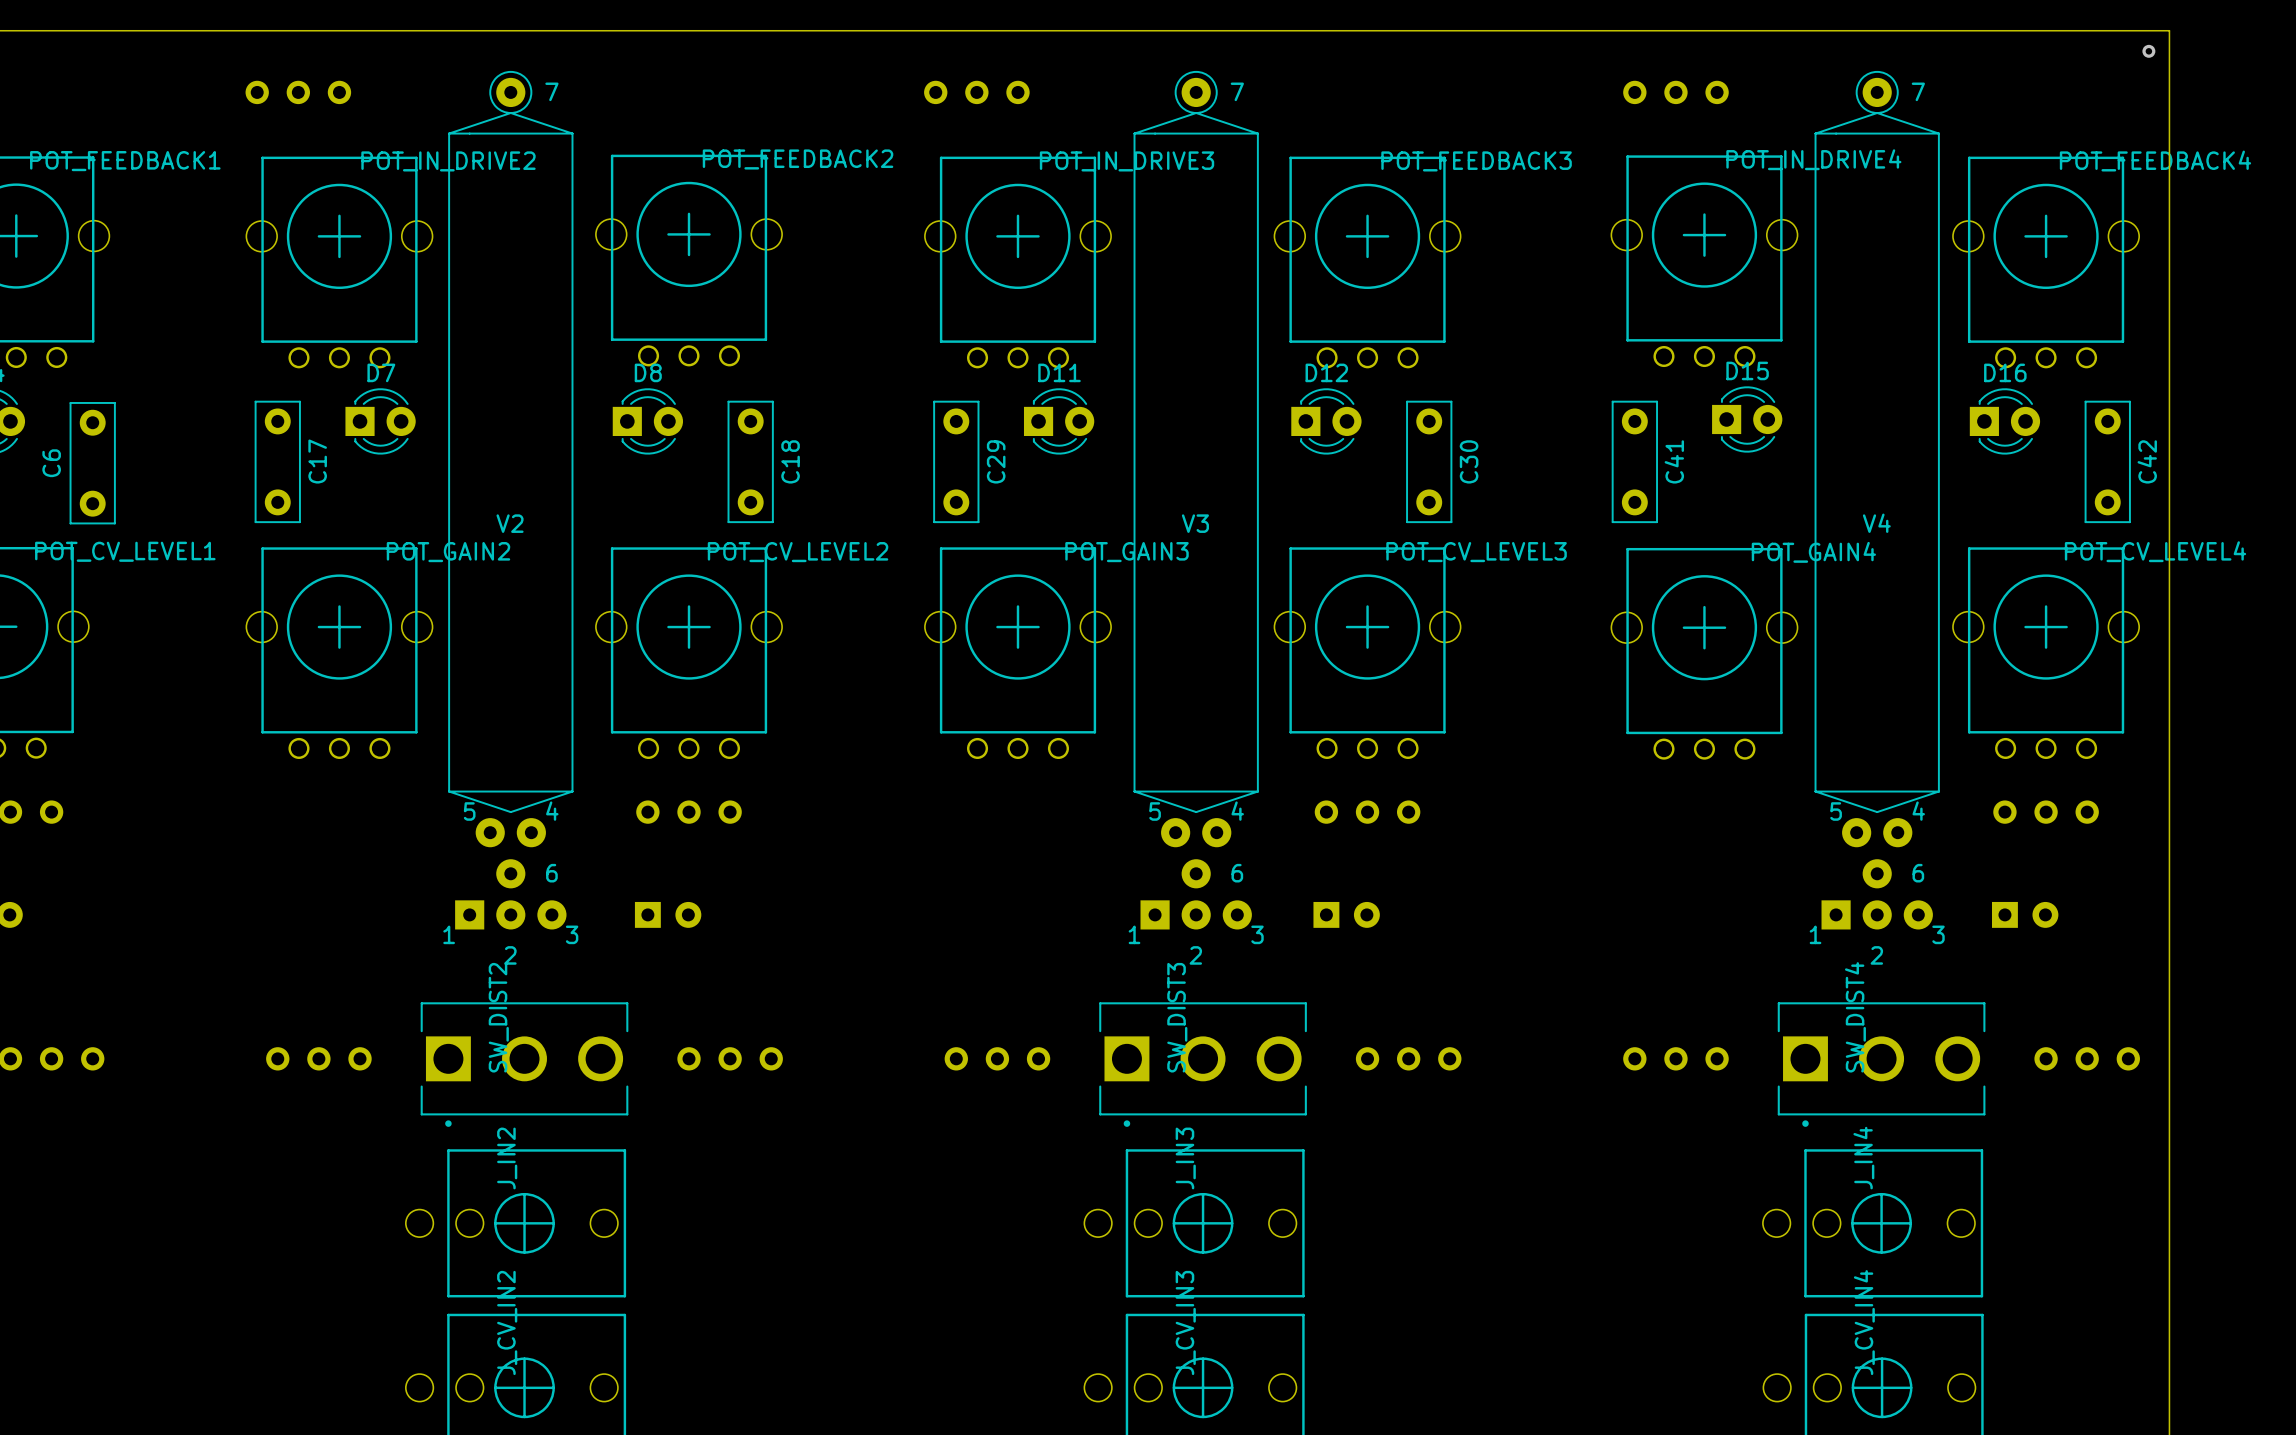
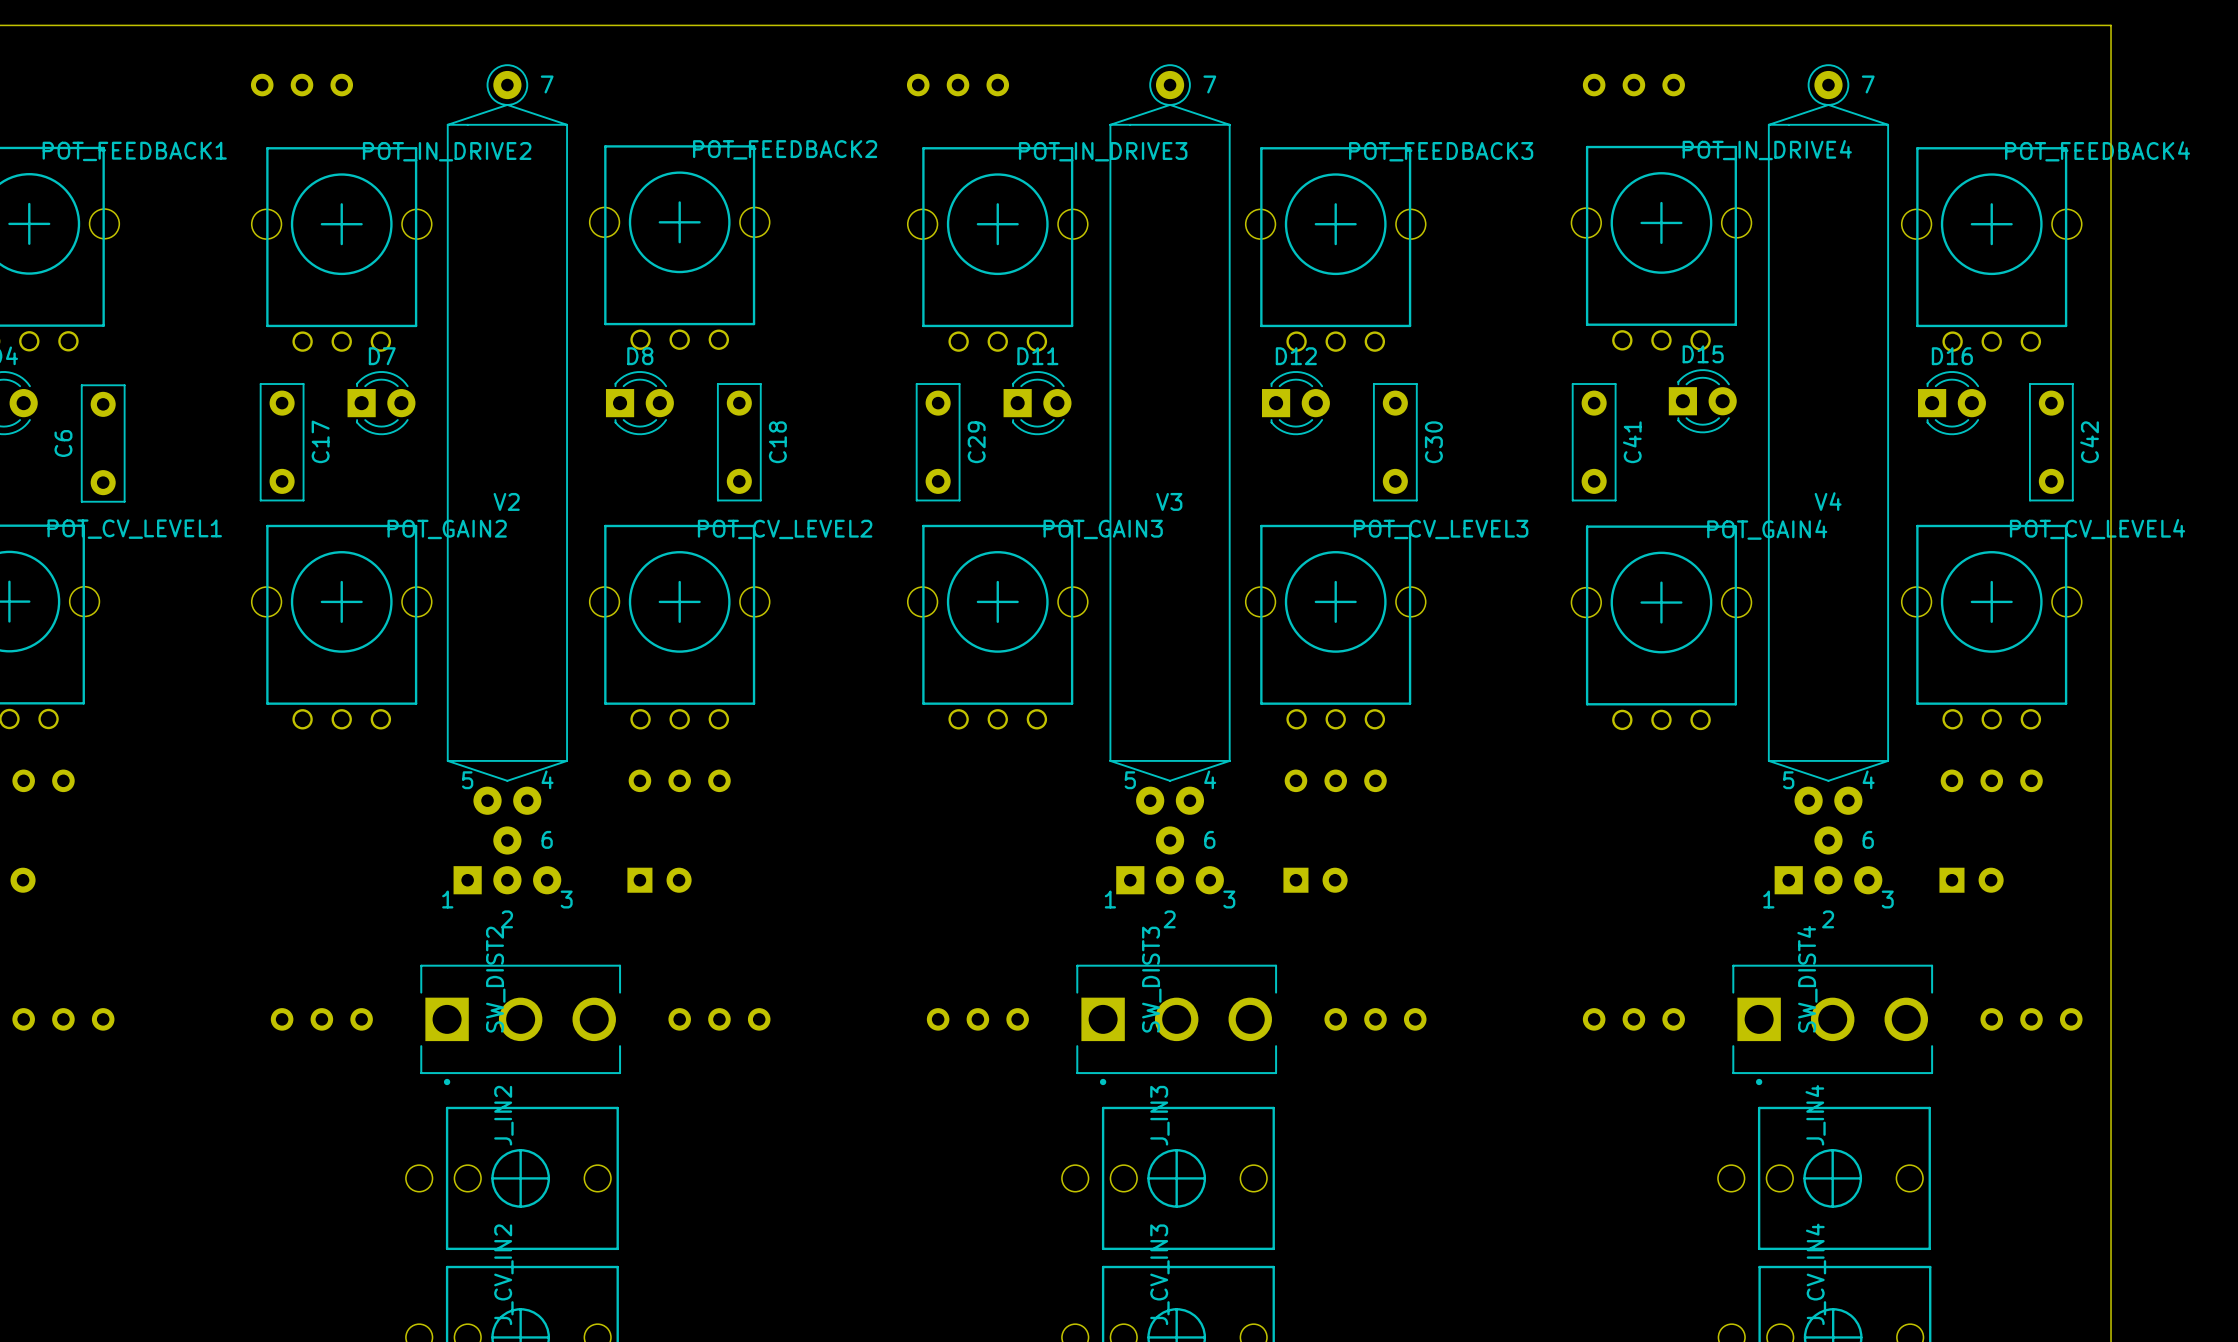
via: (2148, 51) -> none

